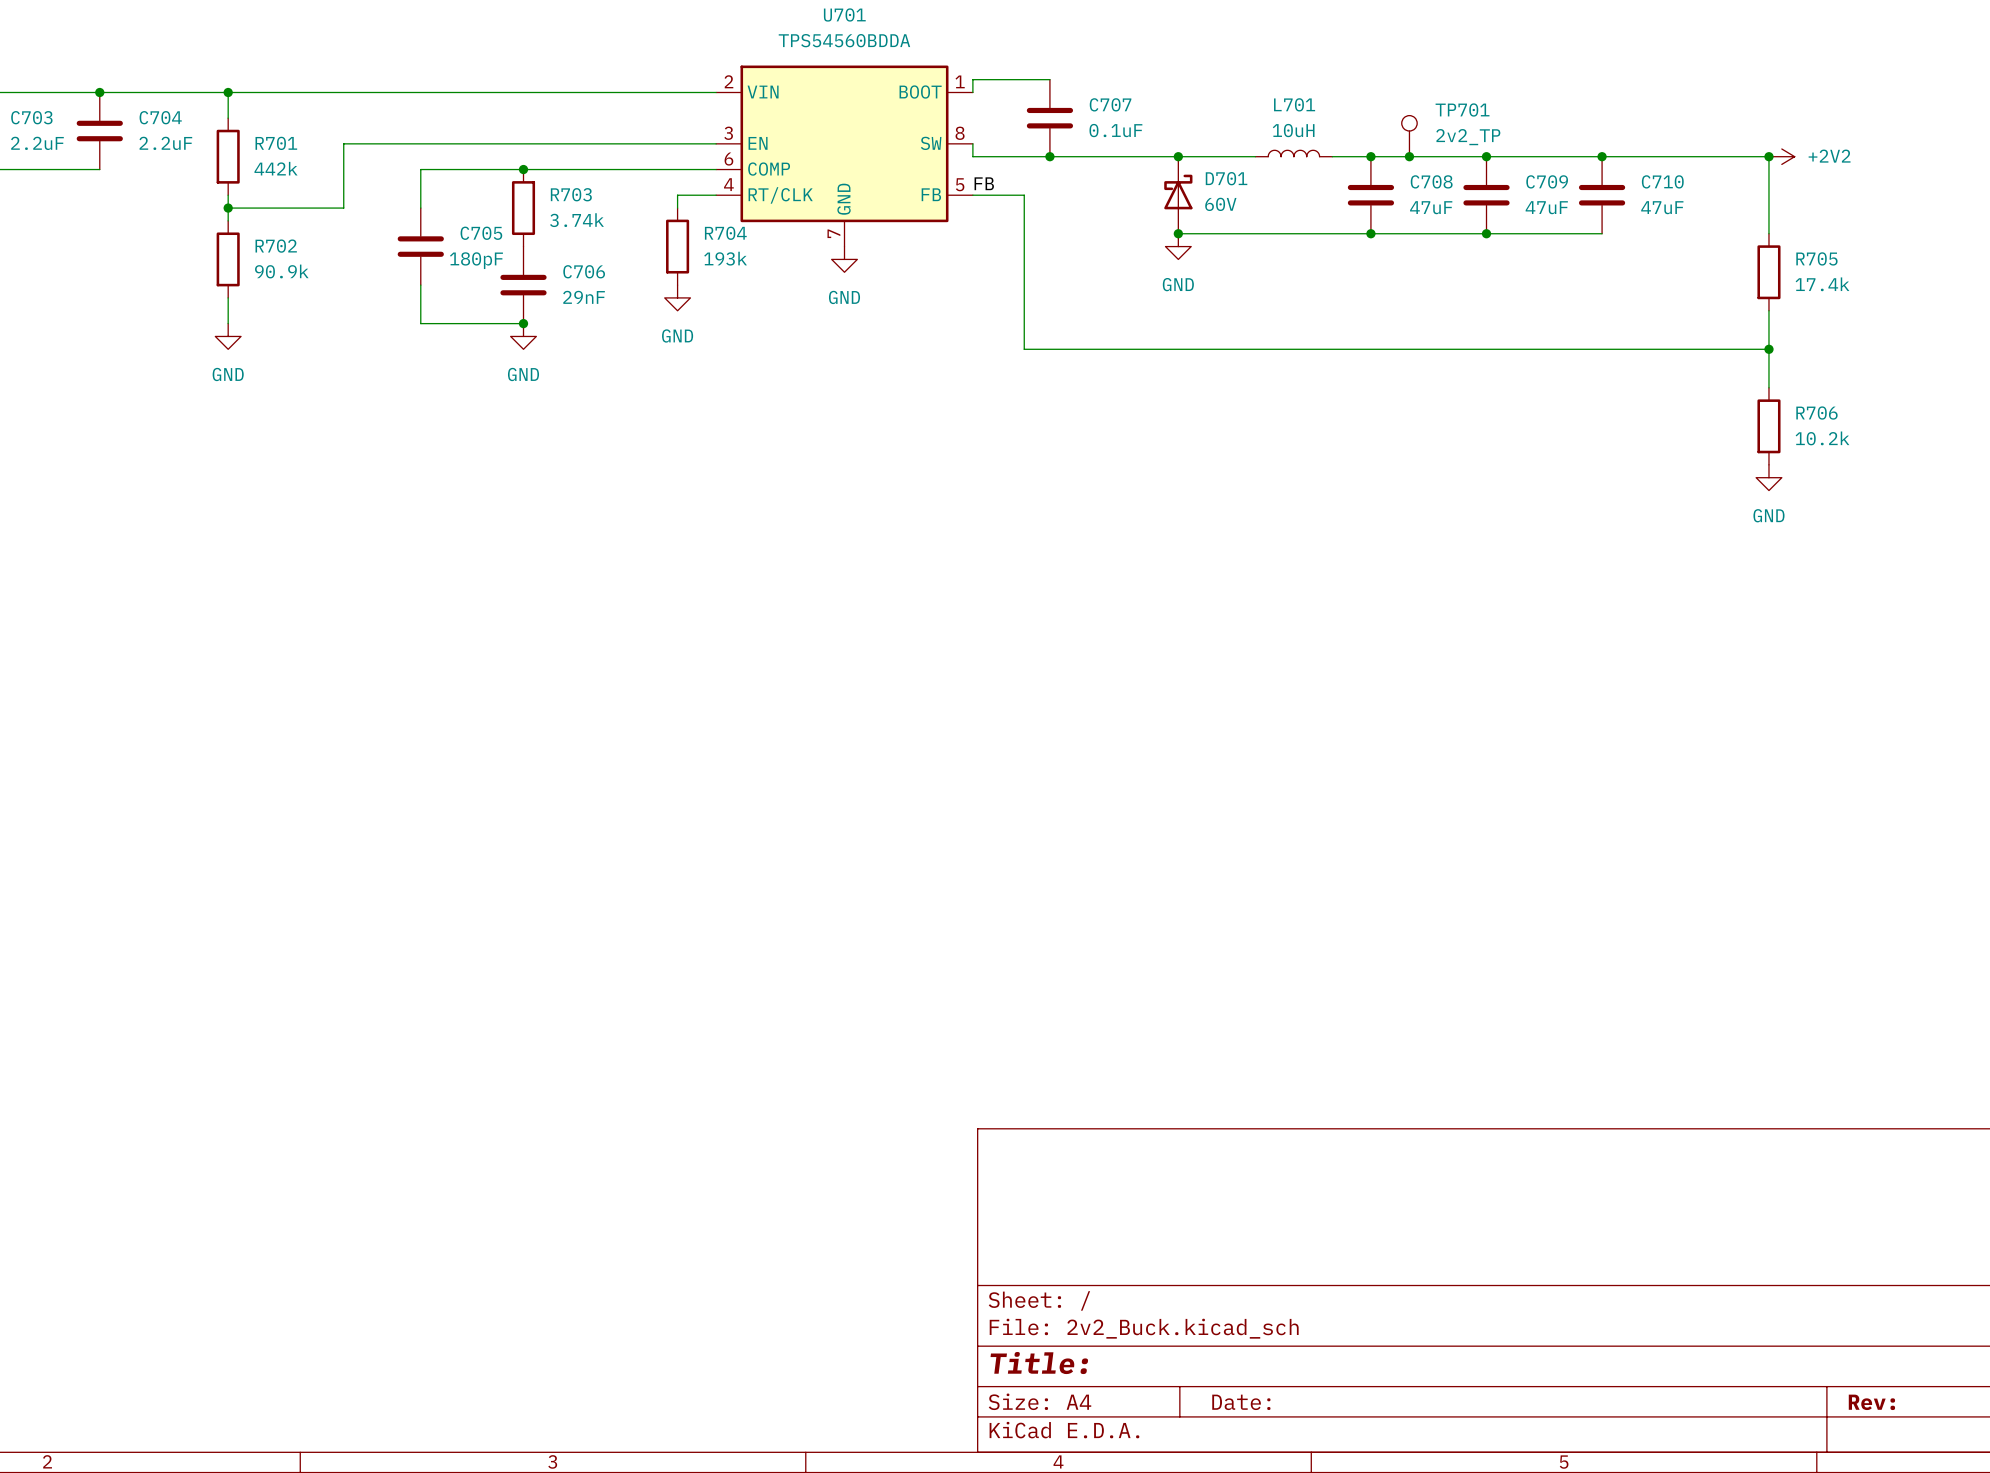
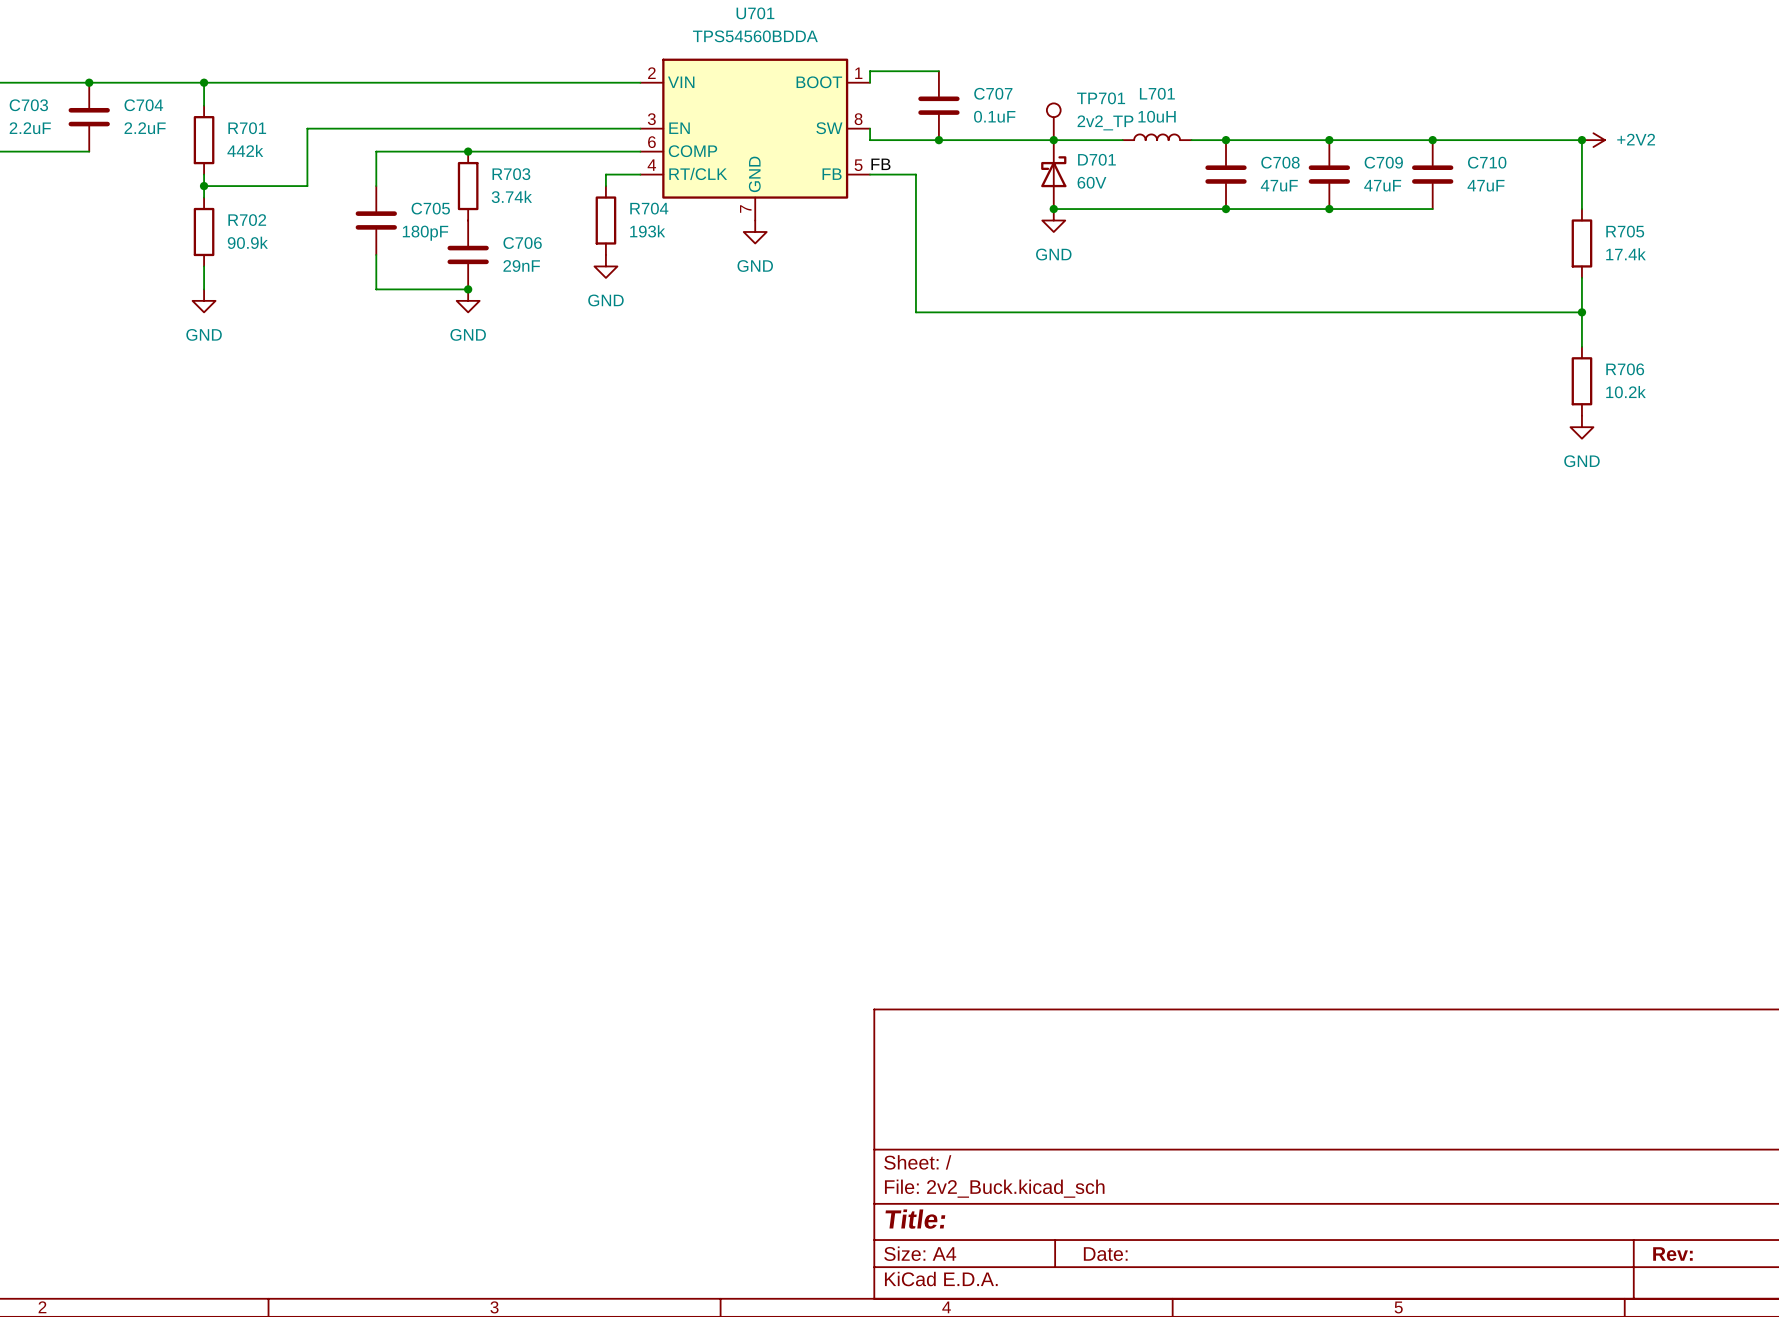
TP701 position: (1409, 136) -> (1053, 121)
junction: (1409, 156) -> none

